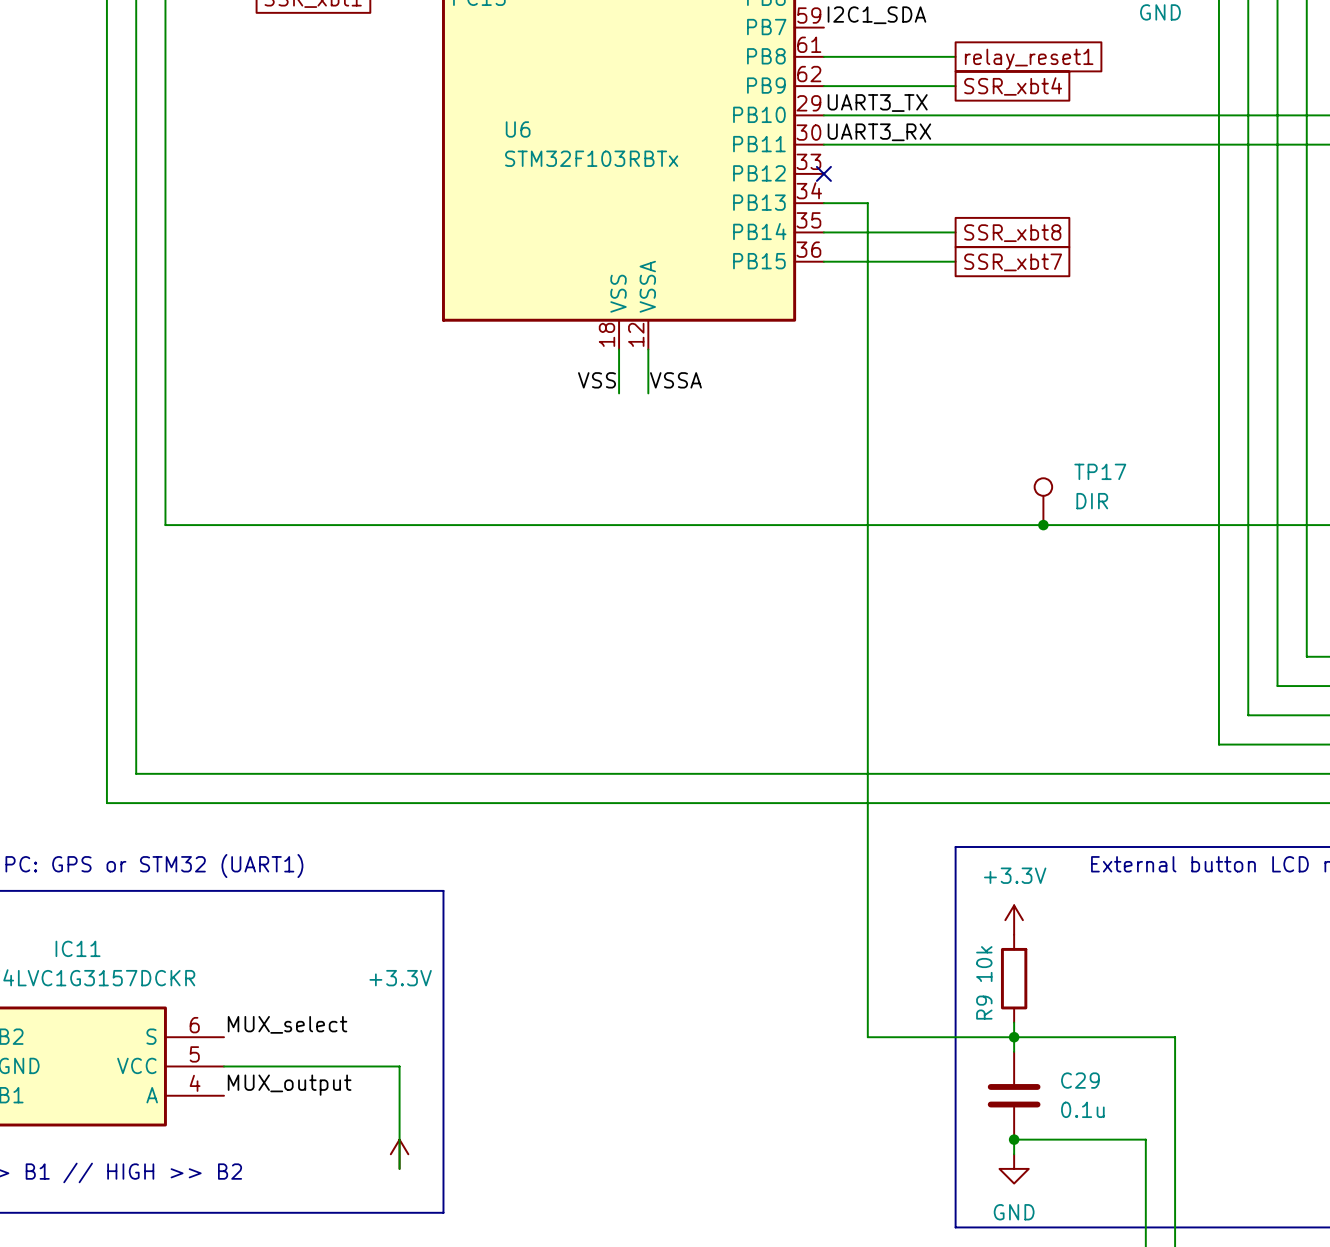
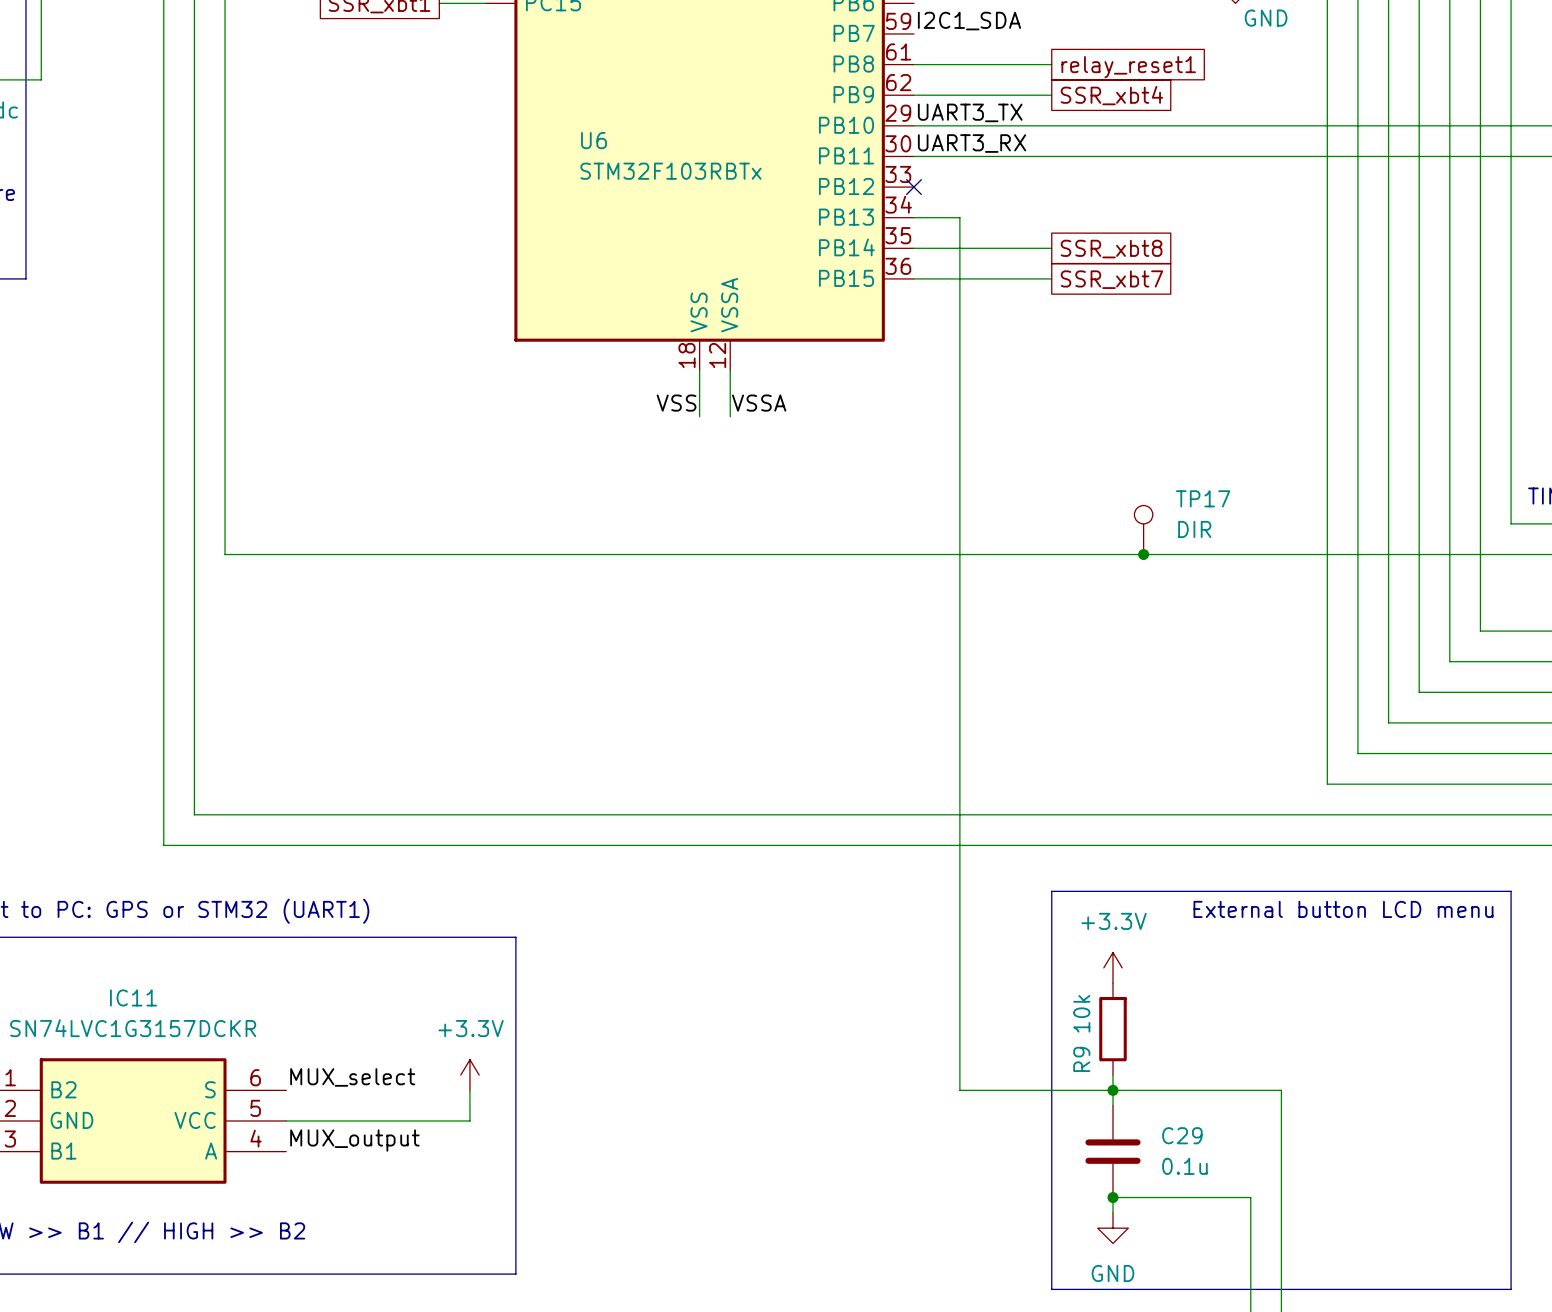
wire: (399, 1066) (399, 1168) -> (469, 1120) (469, 1090)
power symbol position: +3.3V (399, 1154) -> +3.3V (469, 1075)

